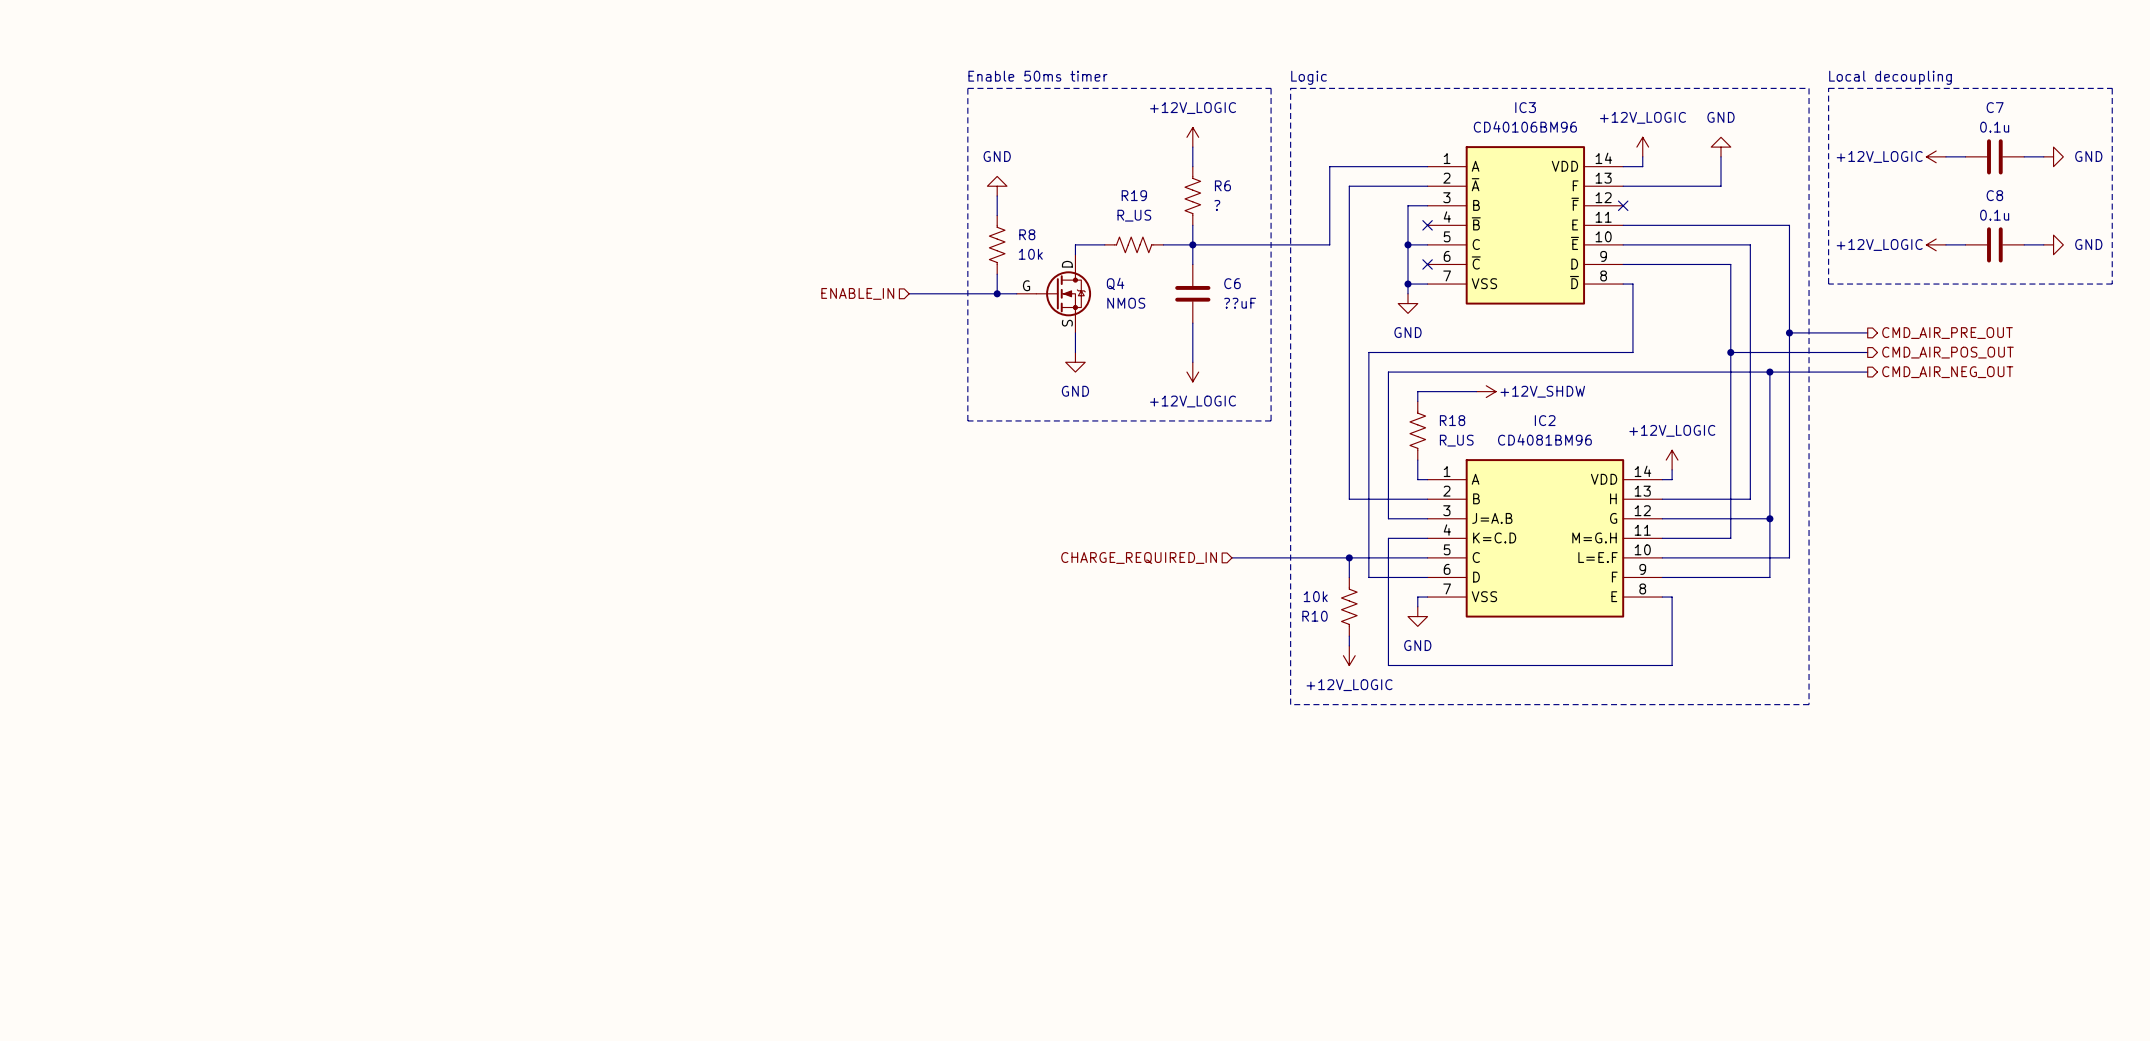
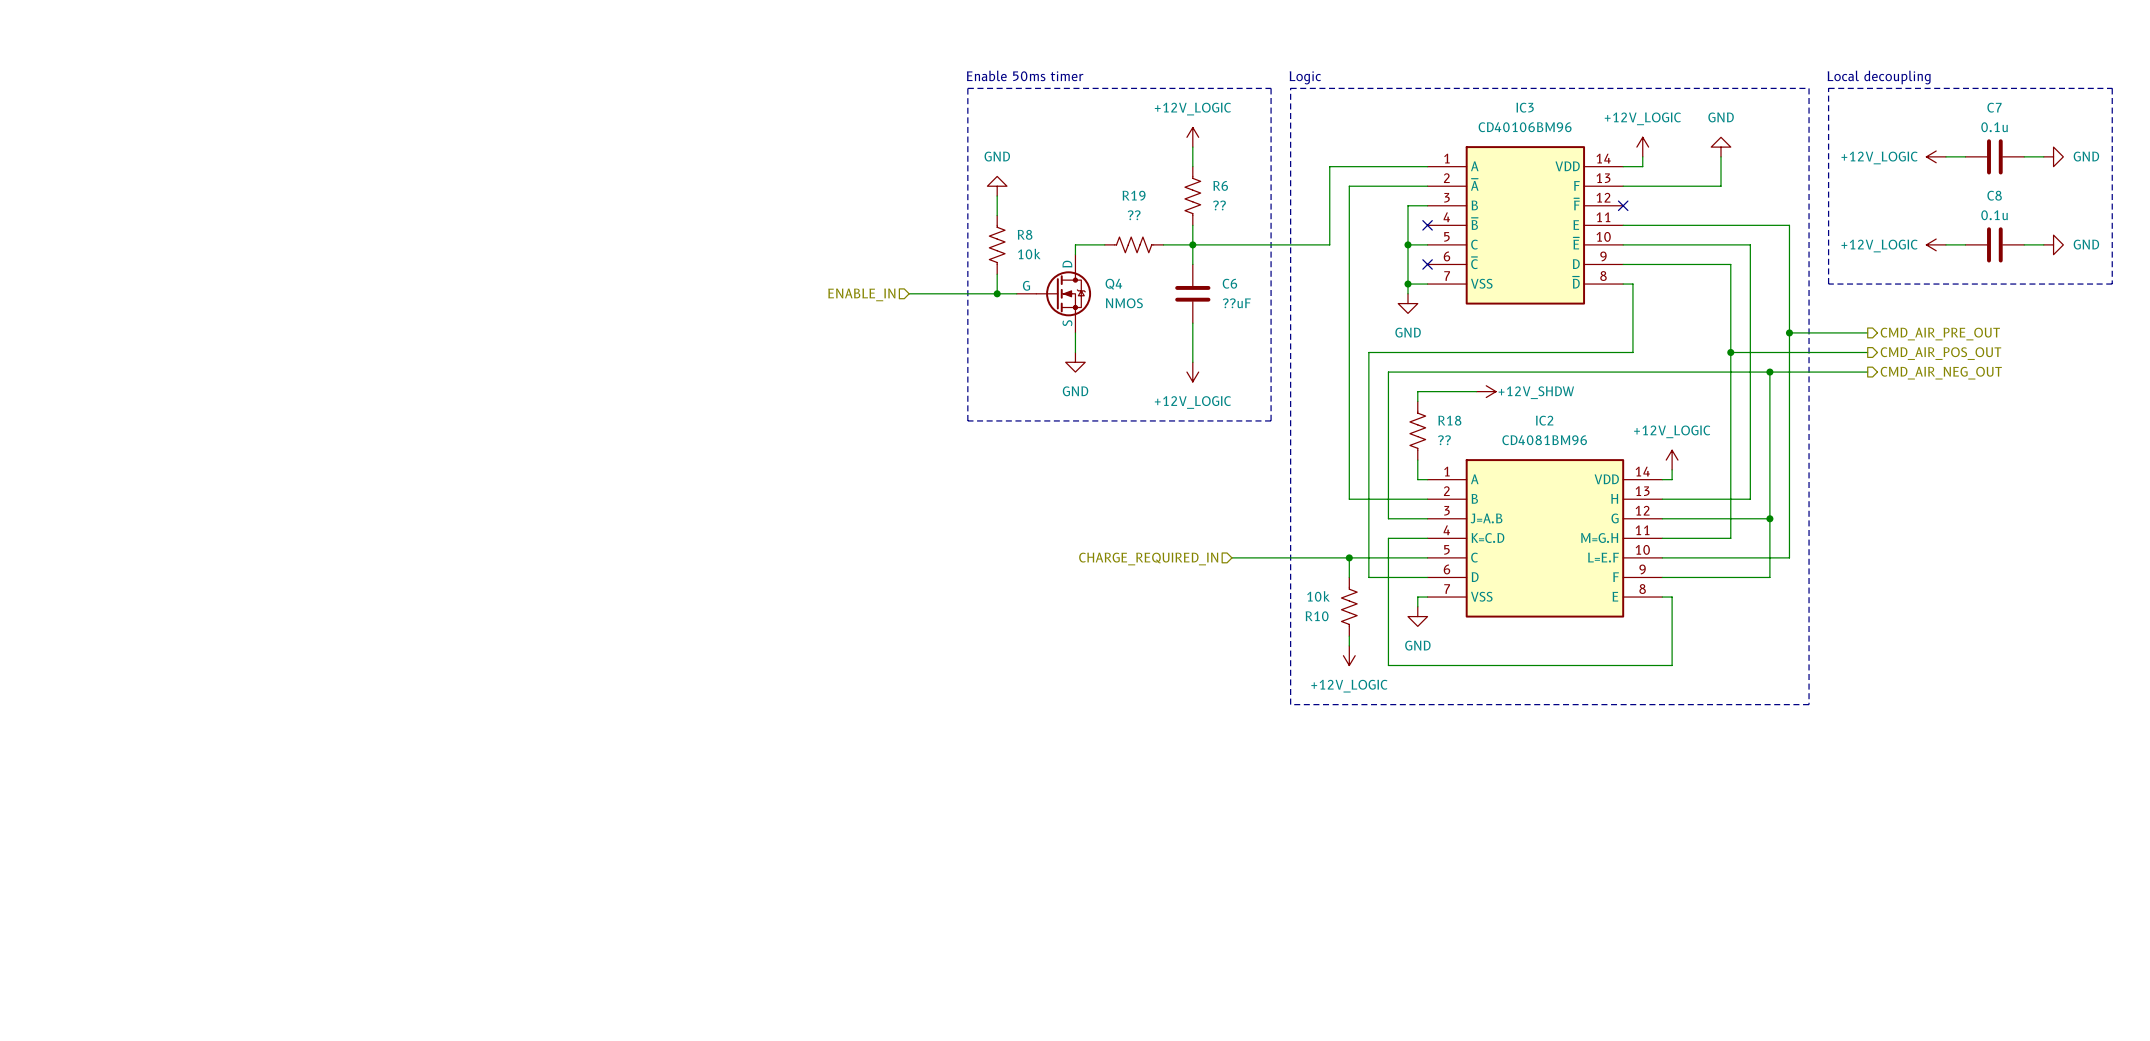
R6 value: ? (1217, 205) -> ?? (1219, 205)
R19 value: R_US (1134, 215) -> ?? (1134, 215)
R18 value: R_US (1456, 440) -> ?? (1444, 440)

